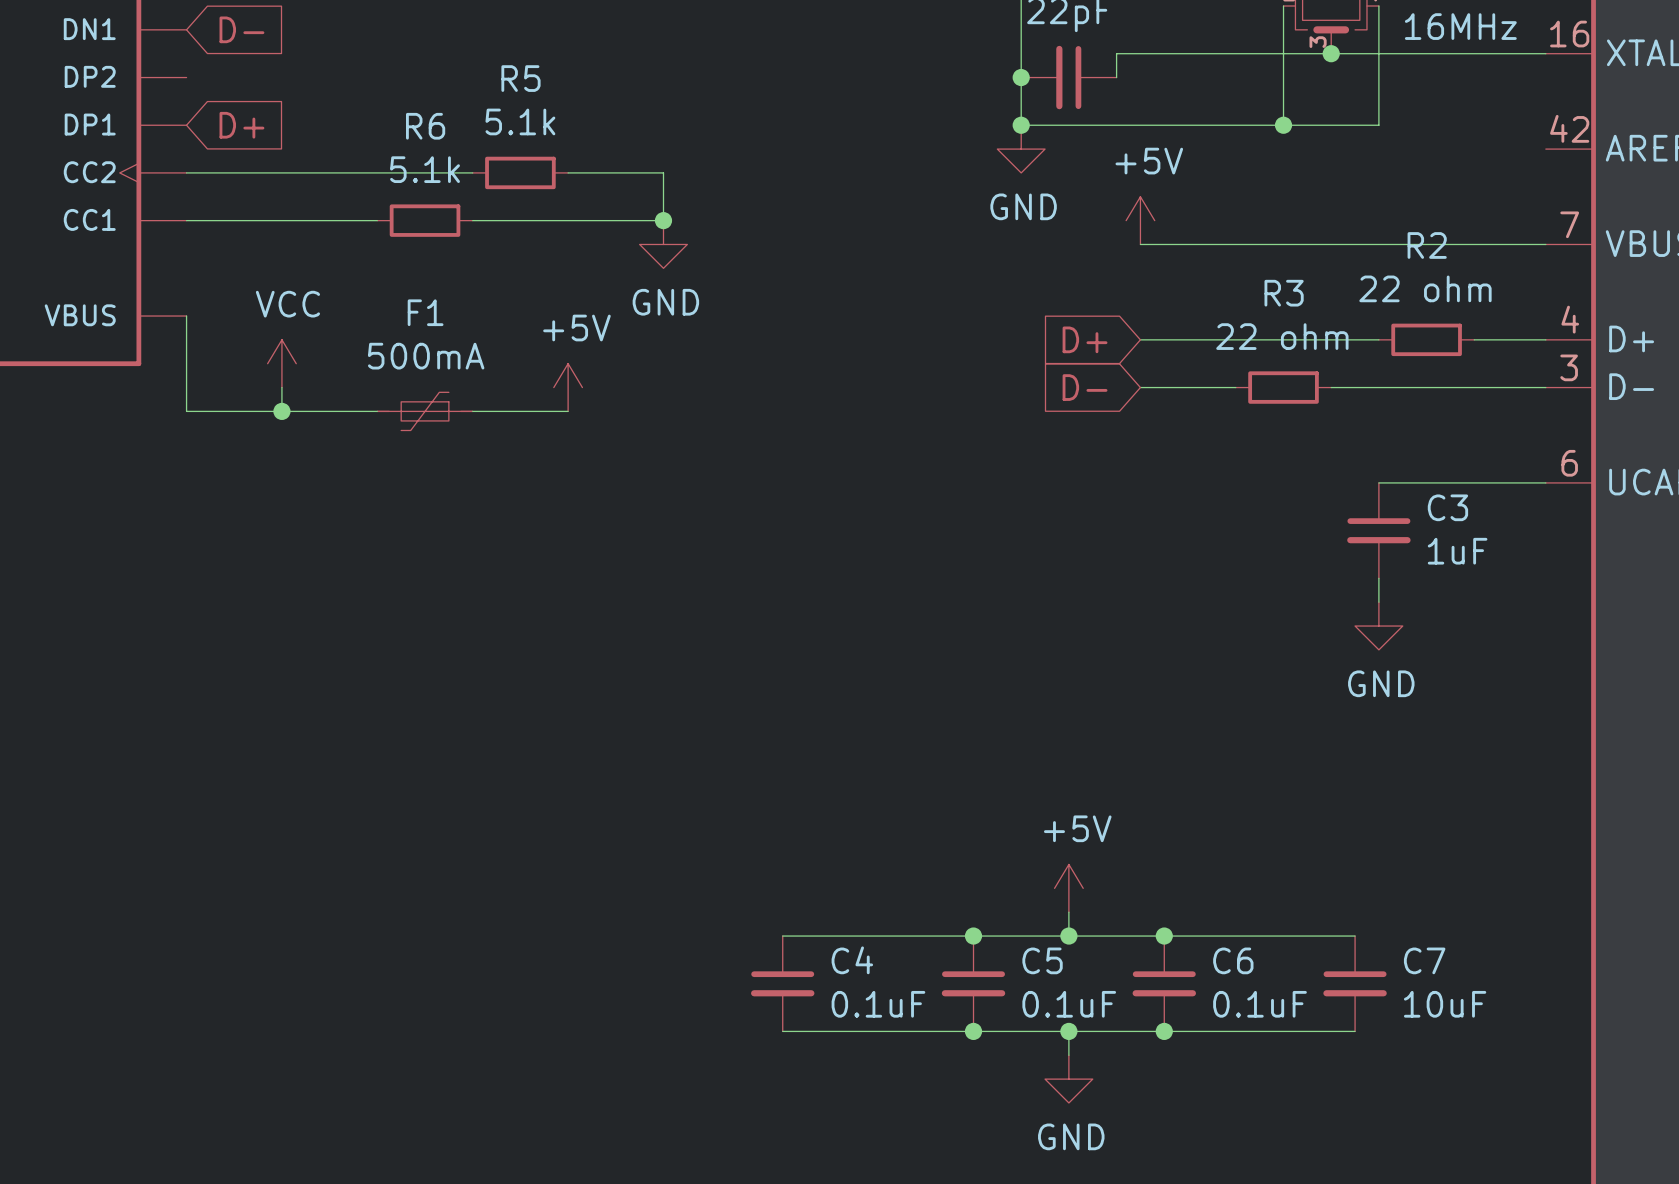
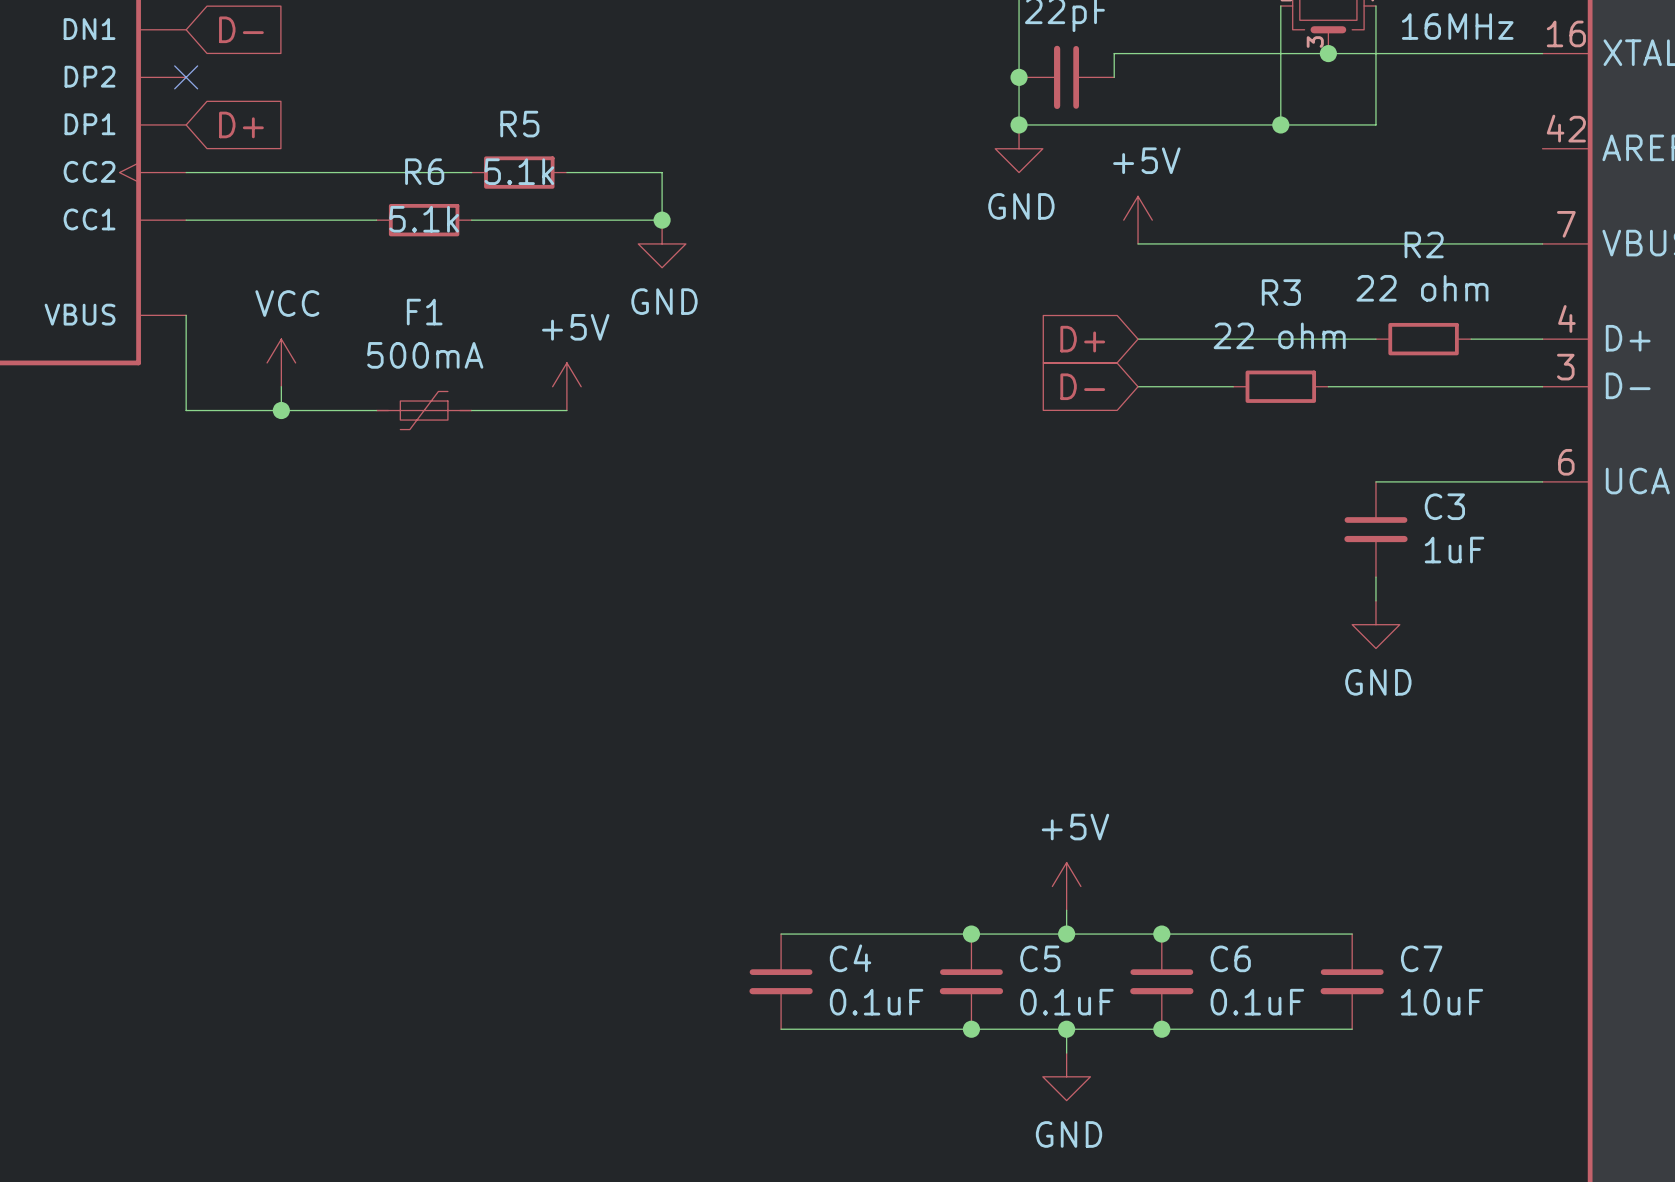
no-connect mark: none -> (186, 77)
R5 name position: R5 (520, 78) -> R5 (519, 124)
R5 value position: 5.1k (520, 121) -> 5.1k (519, 171)
R6 name position: R6 (425, 126) -> R6 (424, 171)
R6 value position: 5.1k (425, 169) -> 5.1k (424, 219)

